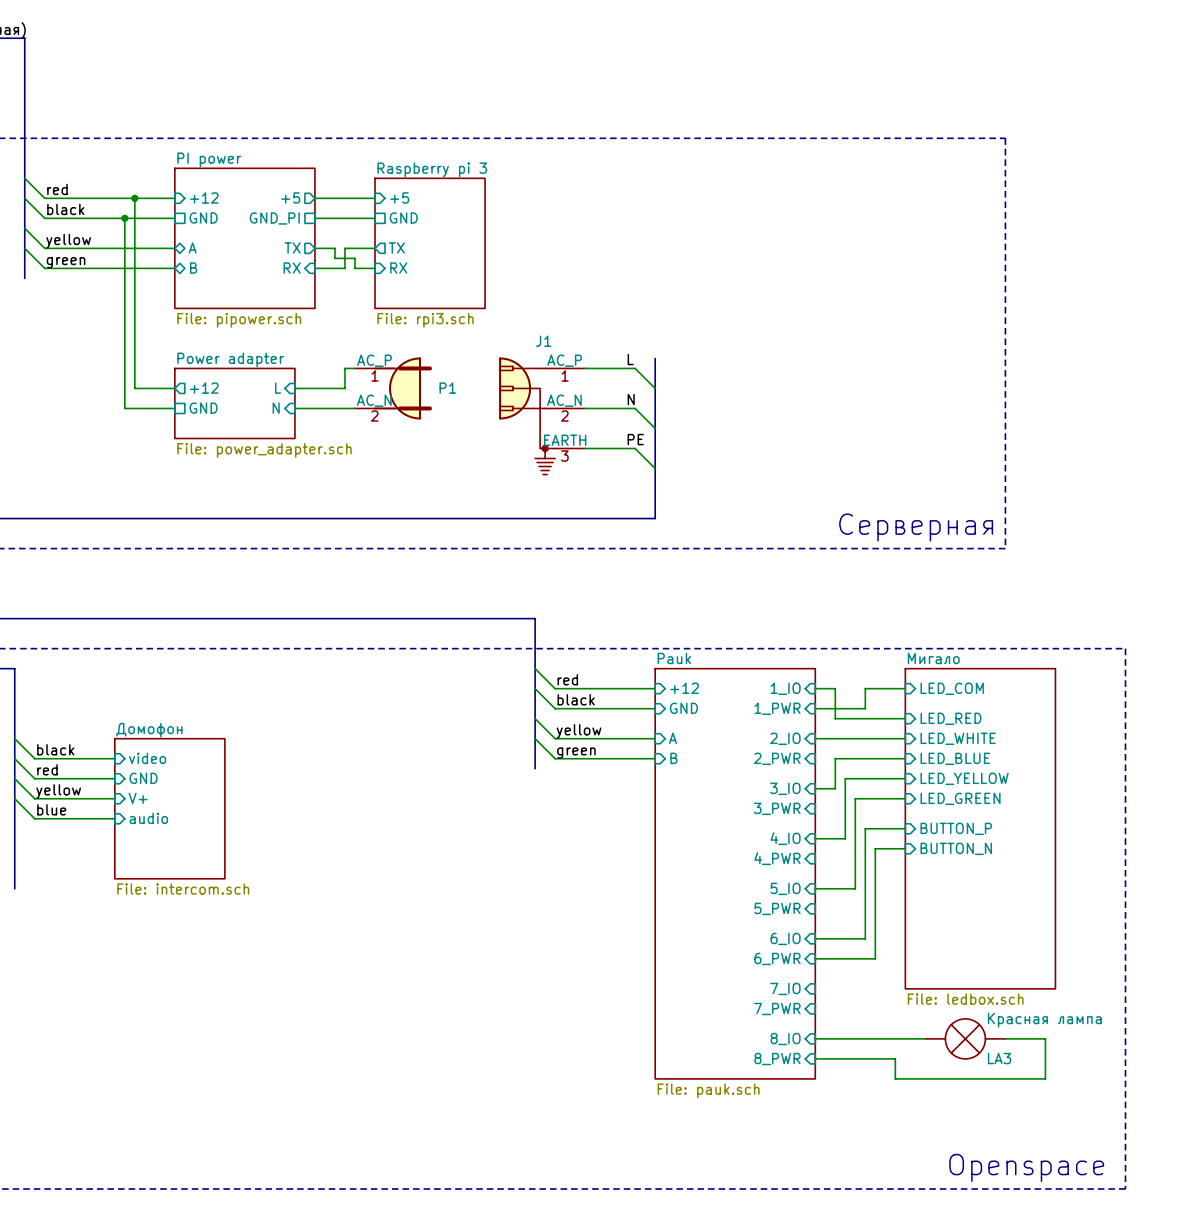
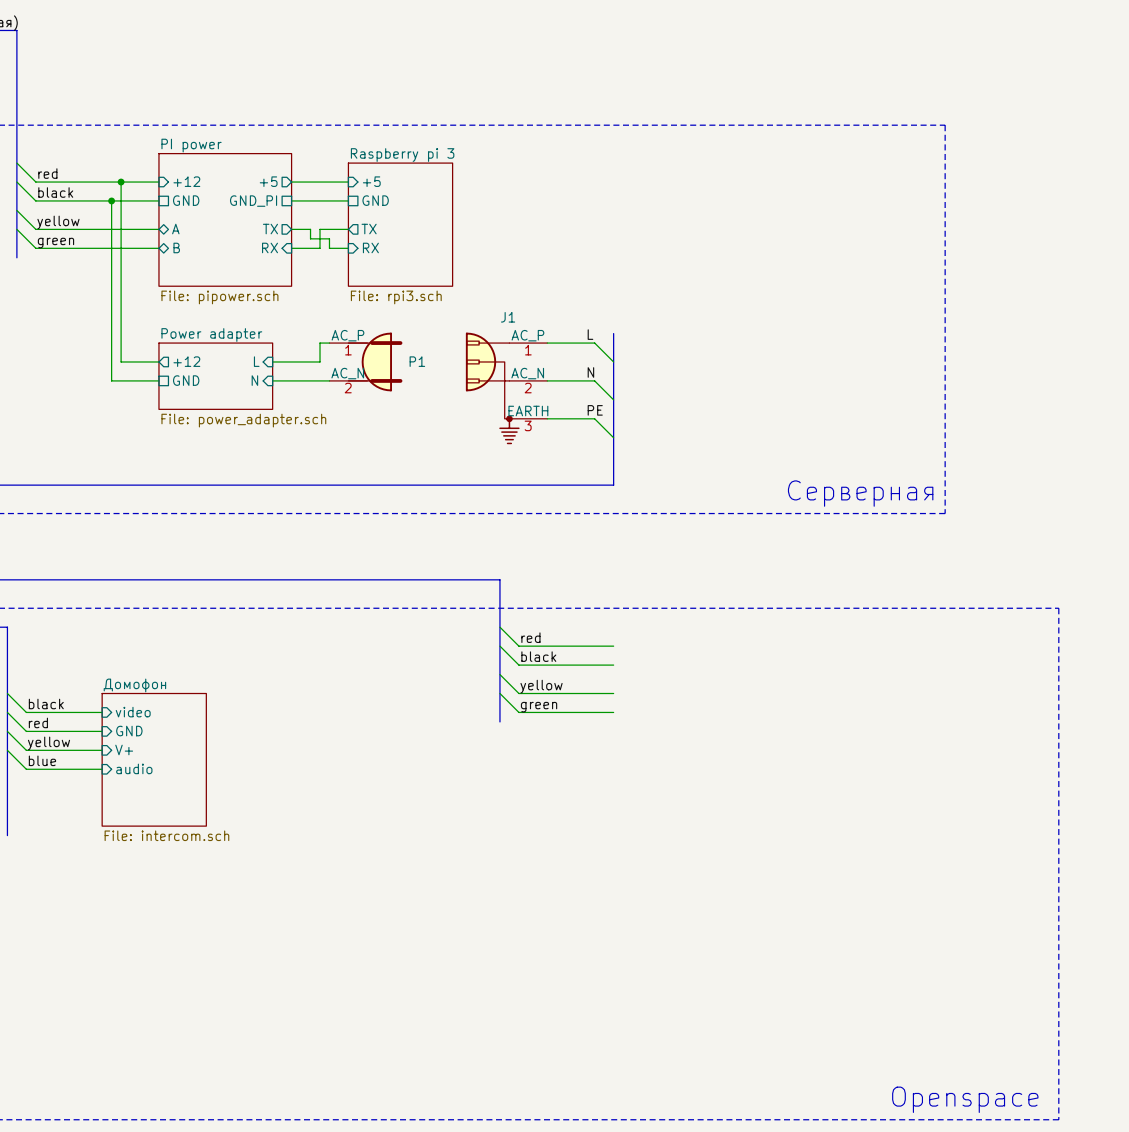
sheet pin: +12 (684, 688) -> none
sheet pin: 1_IO (785, 688) -> none
wire: (815, 688) (835, 688) (835, 718) (905, 718) -> none
wire: (905, 688) (865, 688) (865, 708) (815, 708) -> none
sheet pin: LED_COM (952, 688) -> none
sheet pin: GND (683, 708) -> none
sheet pin: 1_PWR (777, 708) -> none
sheet pin: LED_RED (951, 718) -> none
sheet pin: A (672, 738) -> none
sheet pin: 2_IO (785, 738) -> none
wire: (815, 738) (905, 738) -> none
sheet pin: LED_WHITE (958, 738) -> none
sheet pin: B (673, 758) -> none
sheet pin: 2_PWR (777, 758) -> none
wire: (905, 758) (835, 758) (835, 788) (815, 788) -> none
sheet pin: LED_BLUE (955, 758) -> none
wire: (905, 778) (845, 778) (845, 838) (815, 838) -> none
sheet pin: LED_YELLOW (964, 778) -> none
sheet pin: 3_IO (785, 788) -> none
wire: (905, 798) (855, 798) (855, 888) (815, 888) -> none
sheet pin: LED_GREEN (960, 798) -> none
sheet pin: 3_PWR (777, 808) -> none
wire: (905, 828) (865, 828) (865, 938) (815, 938) -> none
sheet pin: BUTTON_P (956, 828) -> none
sheet Мигало: File: ledbox.sch (980, 828) -> none
sheet pin: 4_IO (785, 838) -> none
wire: (905, 848) (875, 848) (875, 958) (815, 958) -> none
sheet pin: BUTTON_N (956, 848) -> none
sheet pin: 4_PWR (777, 858) -> none
sheet Pauk: File: pauk.sch (735, 873) -> none
sheet pin: 5_IO (785, 888) -> none
sheet pin: 5_PWR (777, 908) -> none
sheet pin: 6_IO (785, 938) -> none
sheet pin: 6_PWR (777, 958) -> none
sheet pin: 7_IO (785, 988) -> none
sheet pin: 7_PWR (777, 1008) -> none
wire: (815, 1038) (925, 1038) -> none
LA3: Красная лампа (965, 1038) -> none
wire: (1005, 1038) (1045, 1038) (1045, 1078) (895, 1078) (895, 1058) (815, 1058) -> none
sheet pin: 8_IO (785, 1039) -> none
sheet pin: 8_PWR (777, 1059) -> none

